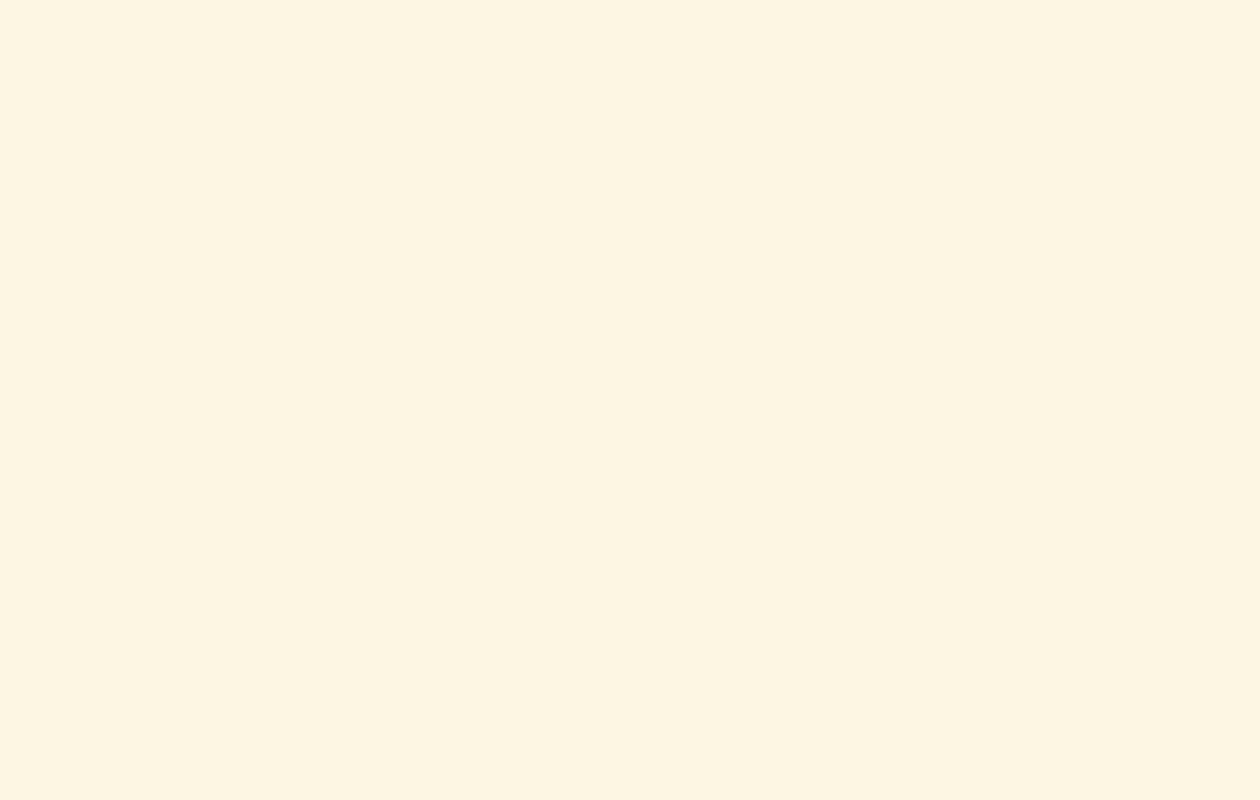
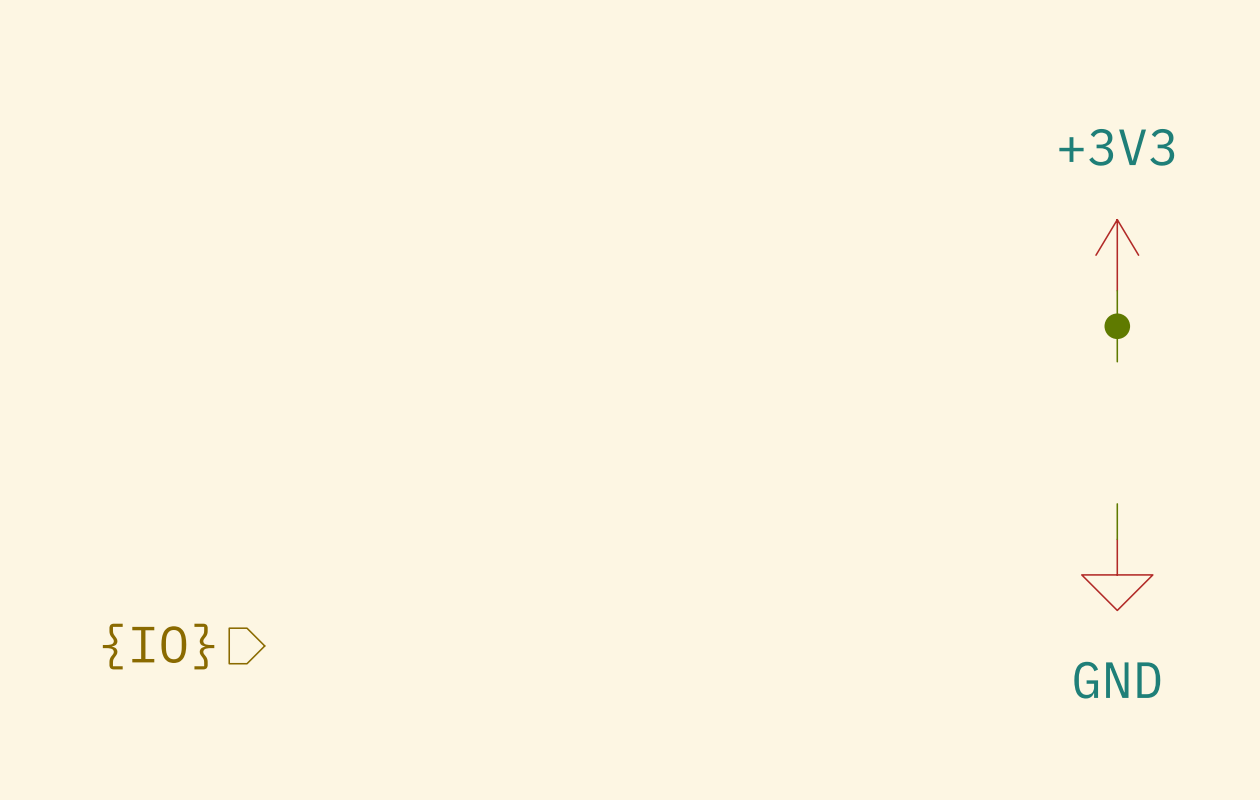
power symbol: none -> +3V3 (1117, 255)
wire: none -> (1117, 290) (1117, 361)
junction: none -> (1117, 326)
wire: none -> (1117, 503) (1117, 539)
power symbol: none -> GND (1117, 574)
hierarchical label: none -> {IO} (158, 646)

